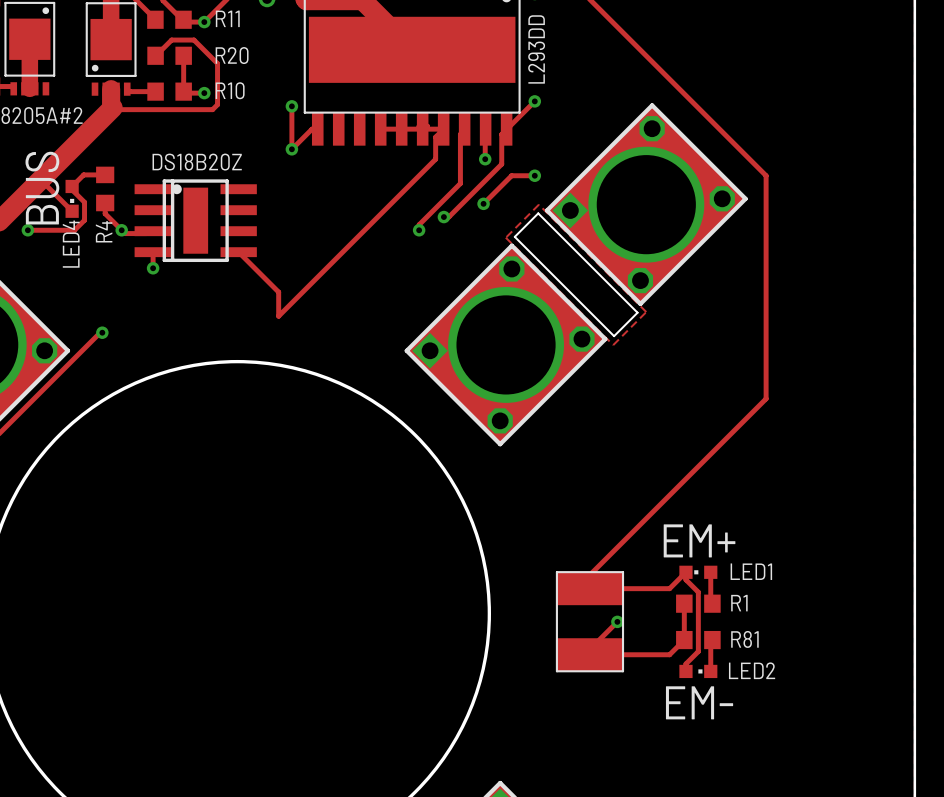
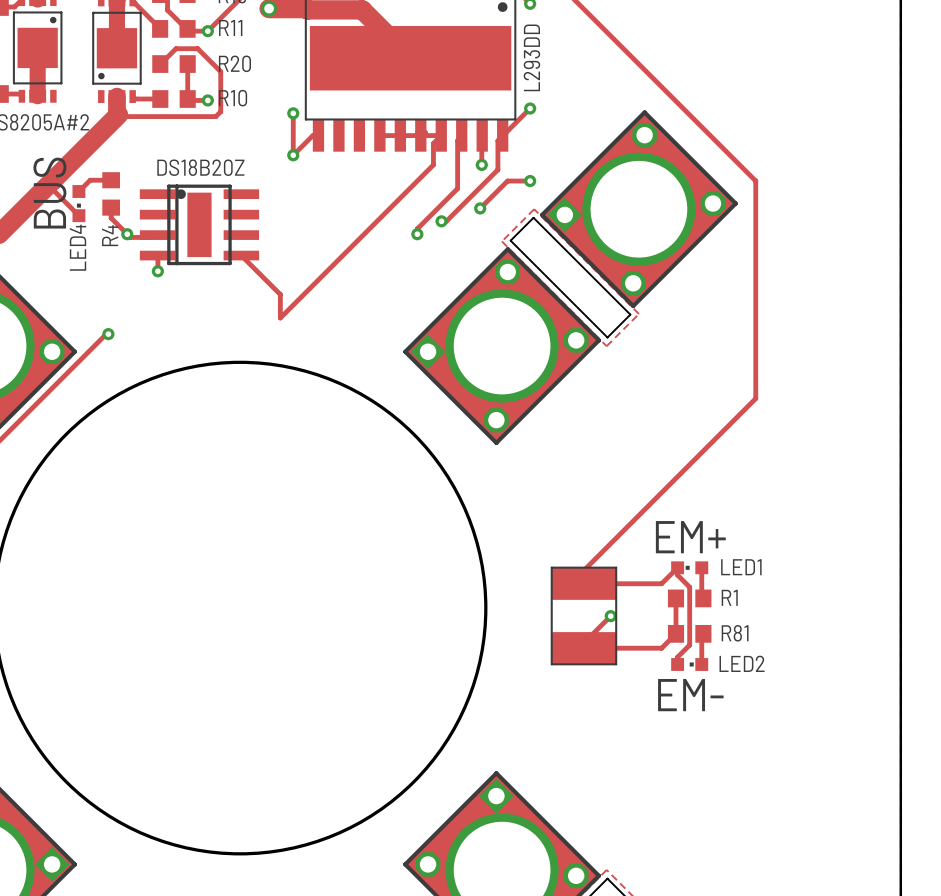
track: (72, 186) (72, 189) (84, 202) (84, 220) (74, 230) (27, 230) -> none
via: (27, 230) -> none

